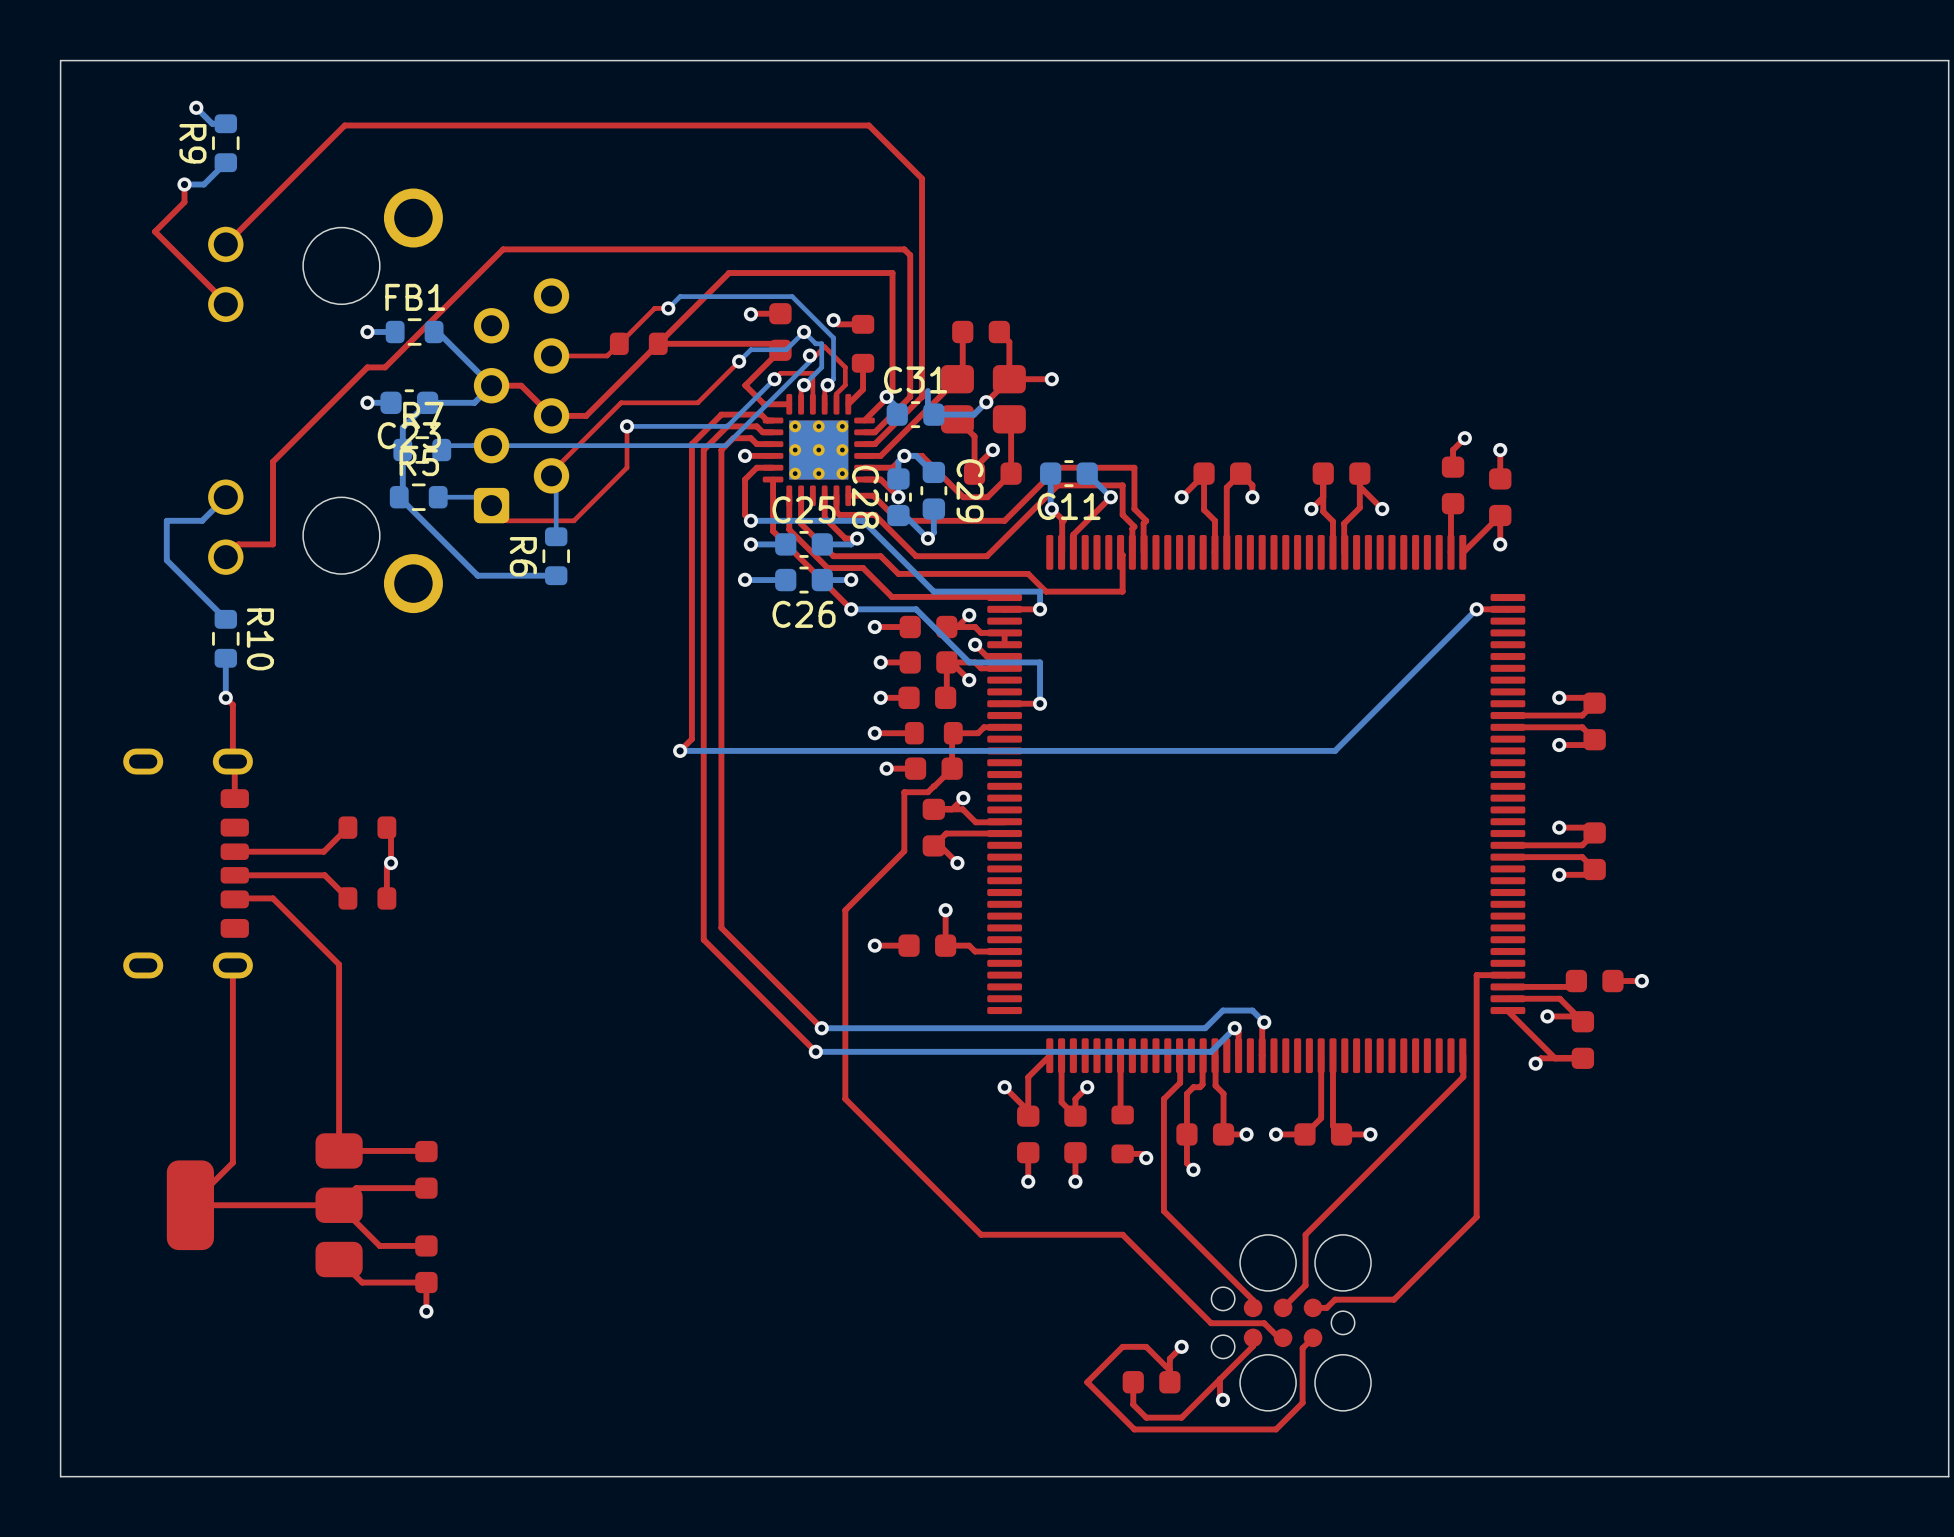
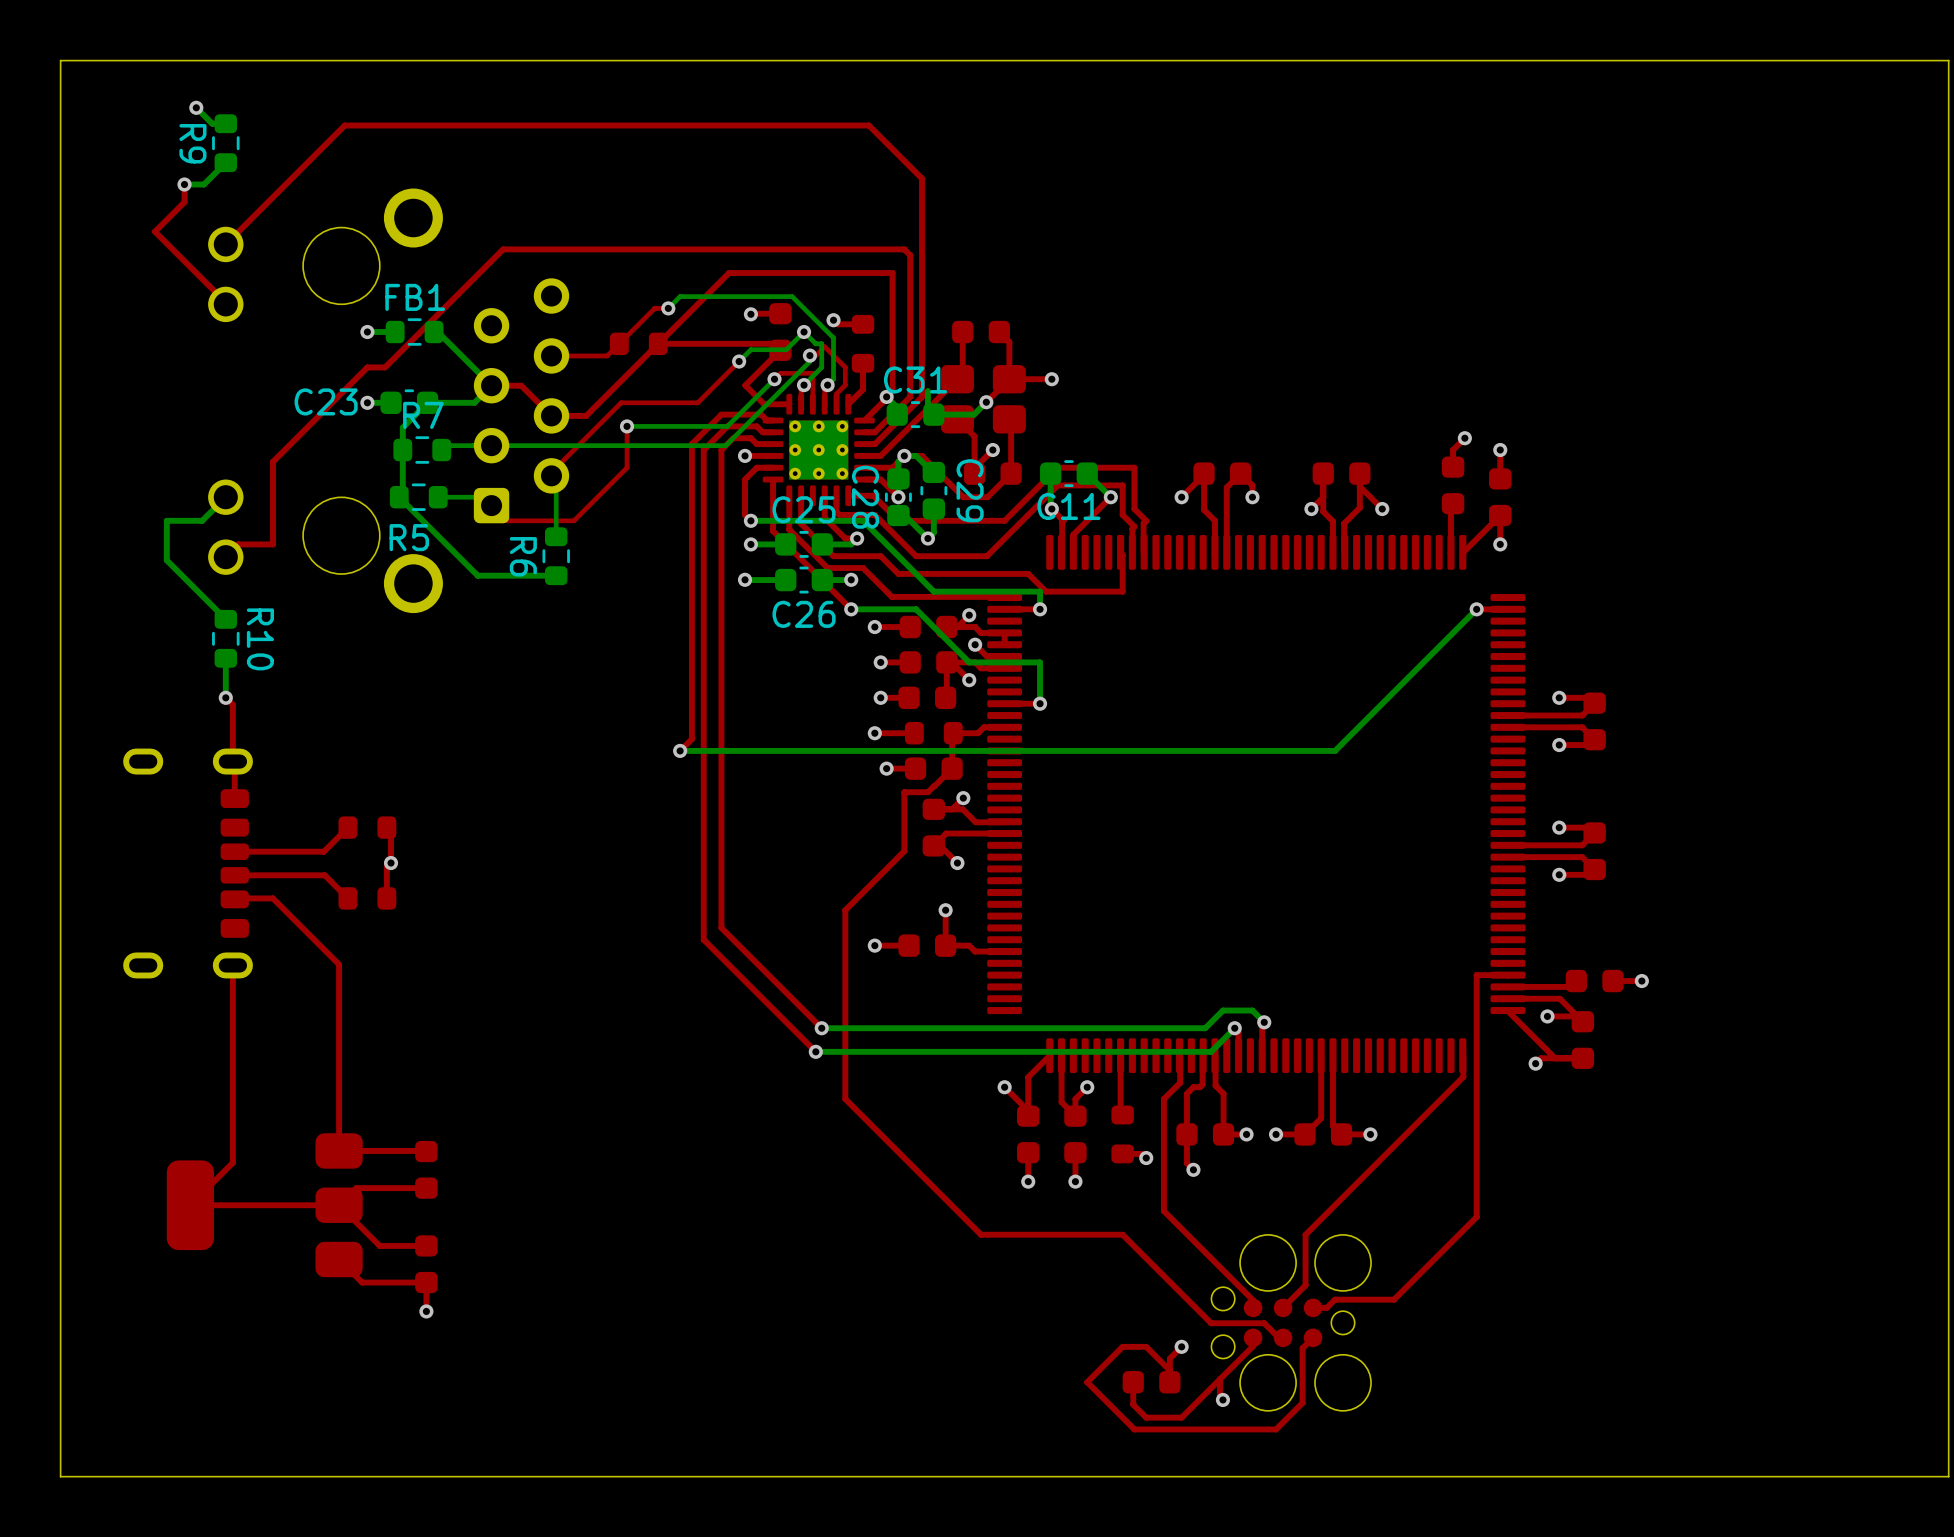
C23 name position: C23 (409, 435) -> C23 (326, 401)
R5 name position: R5 (419, 462) -> R5 (409, 537)

